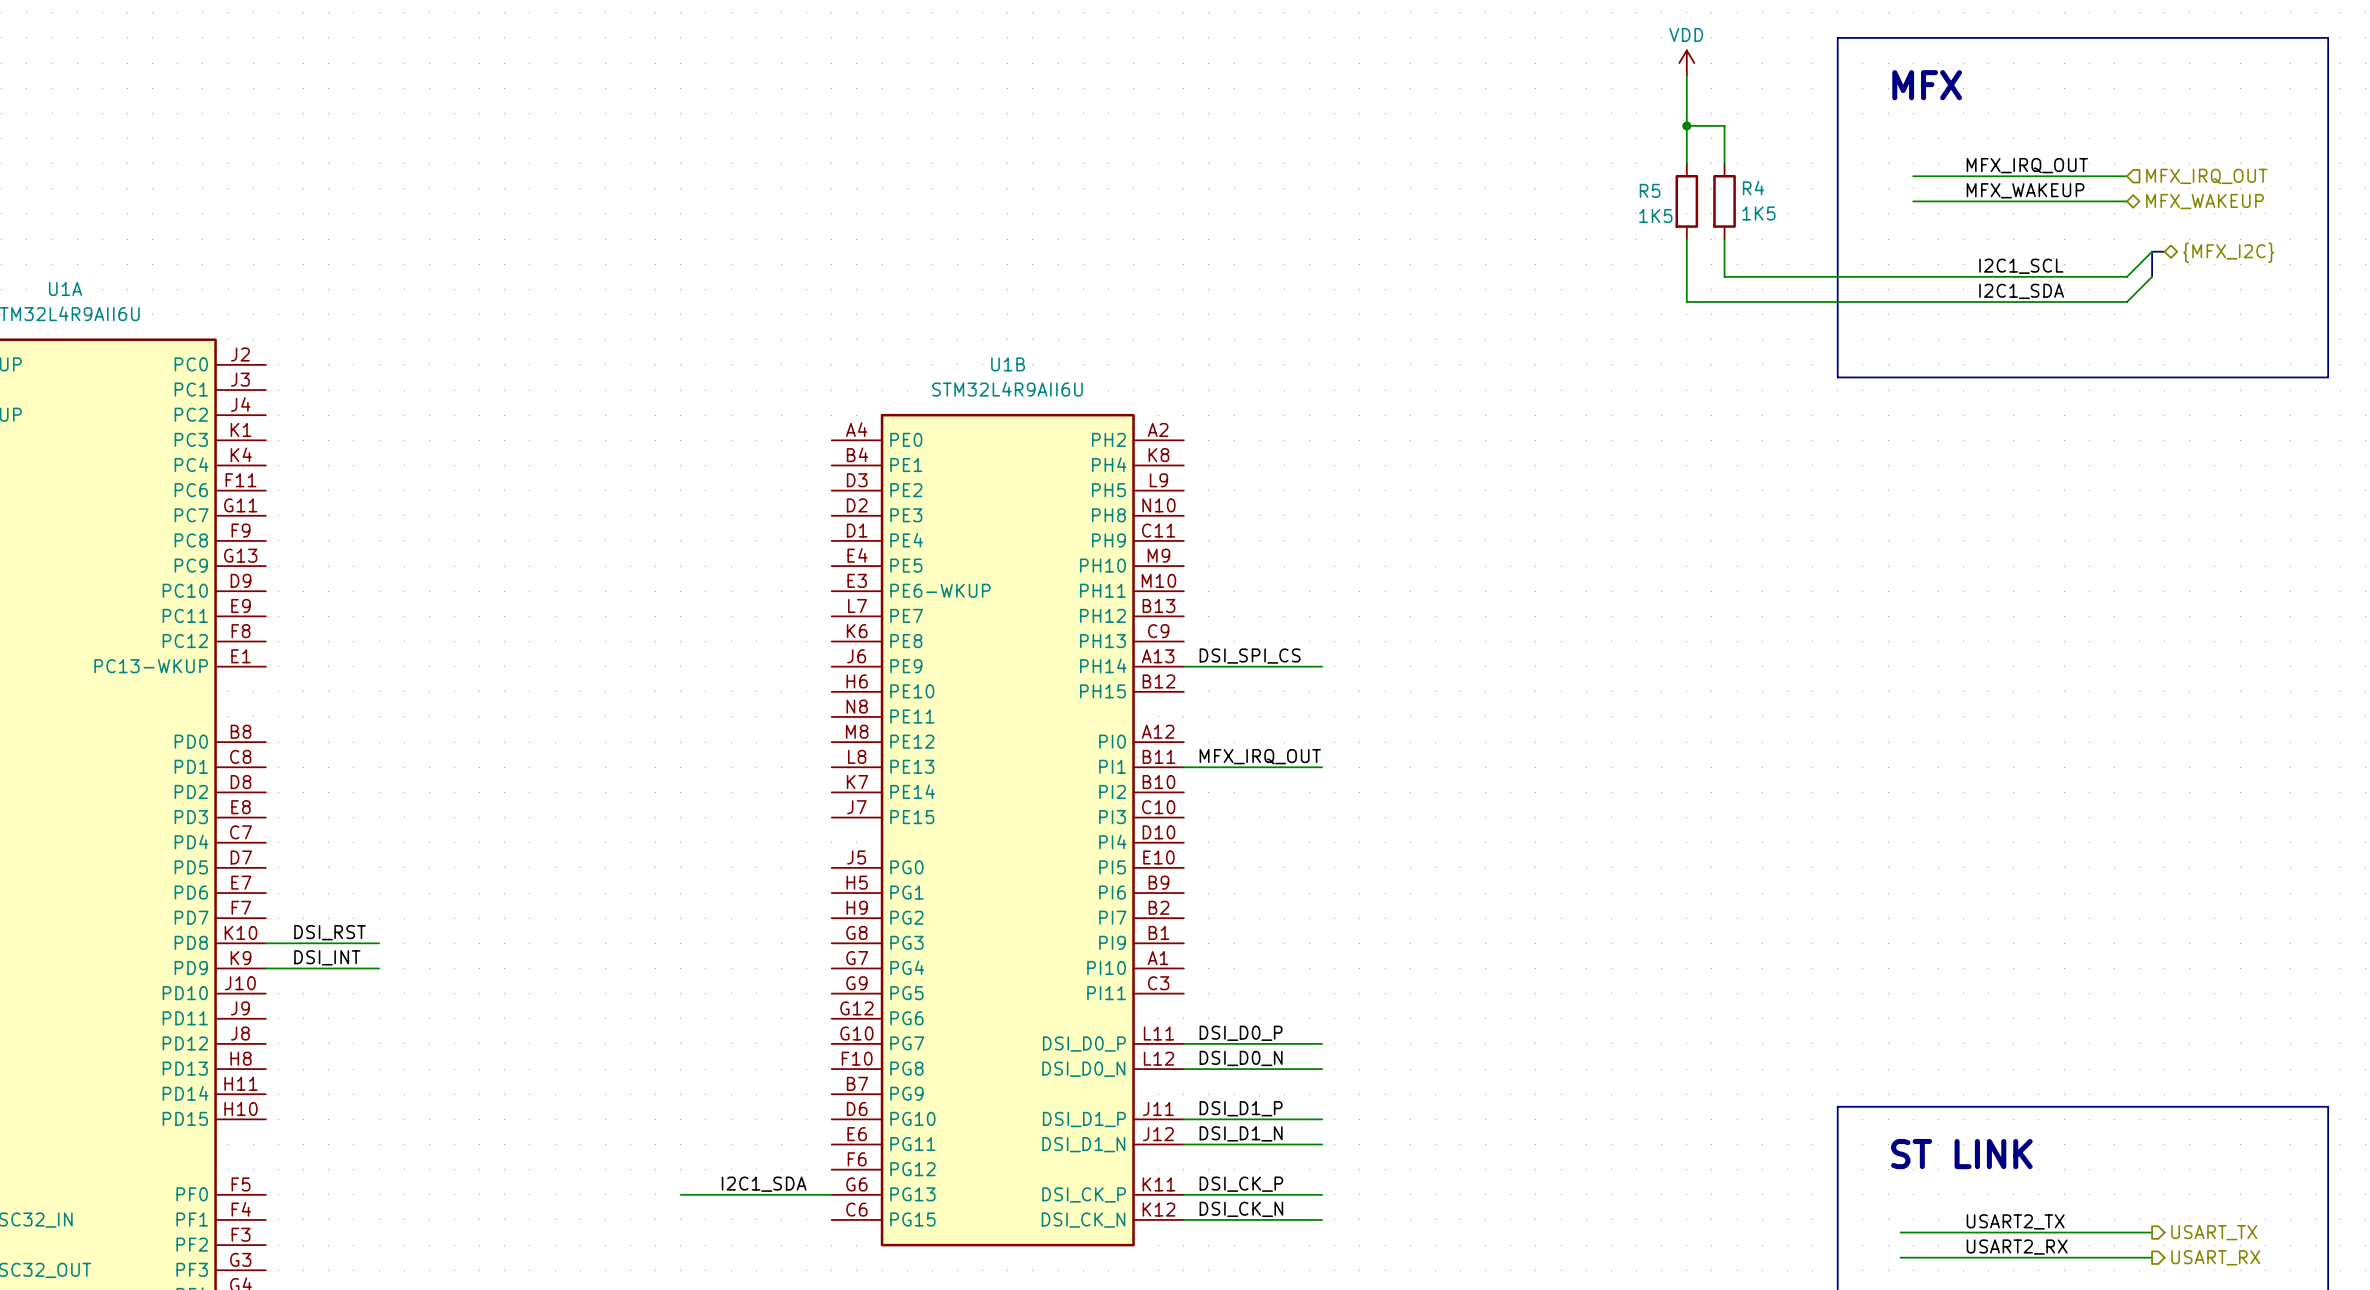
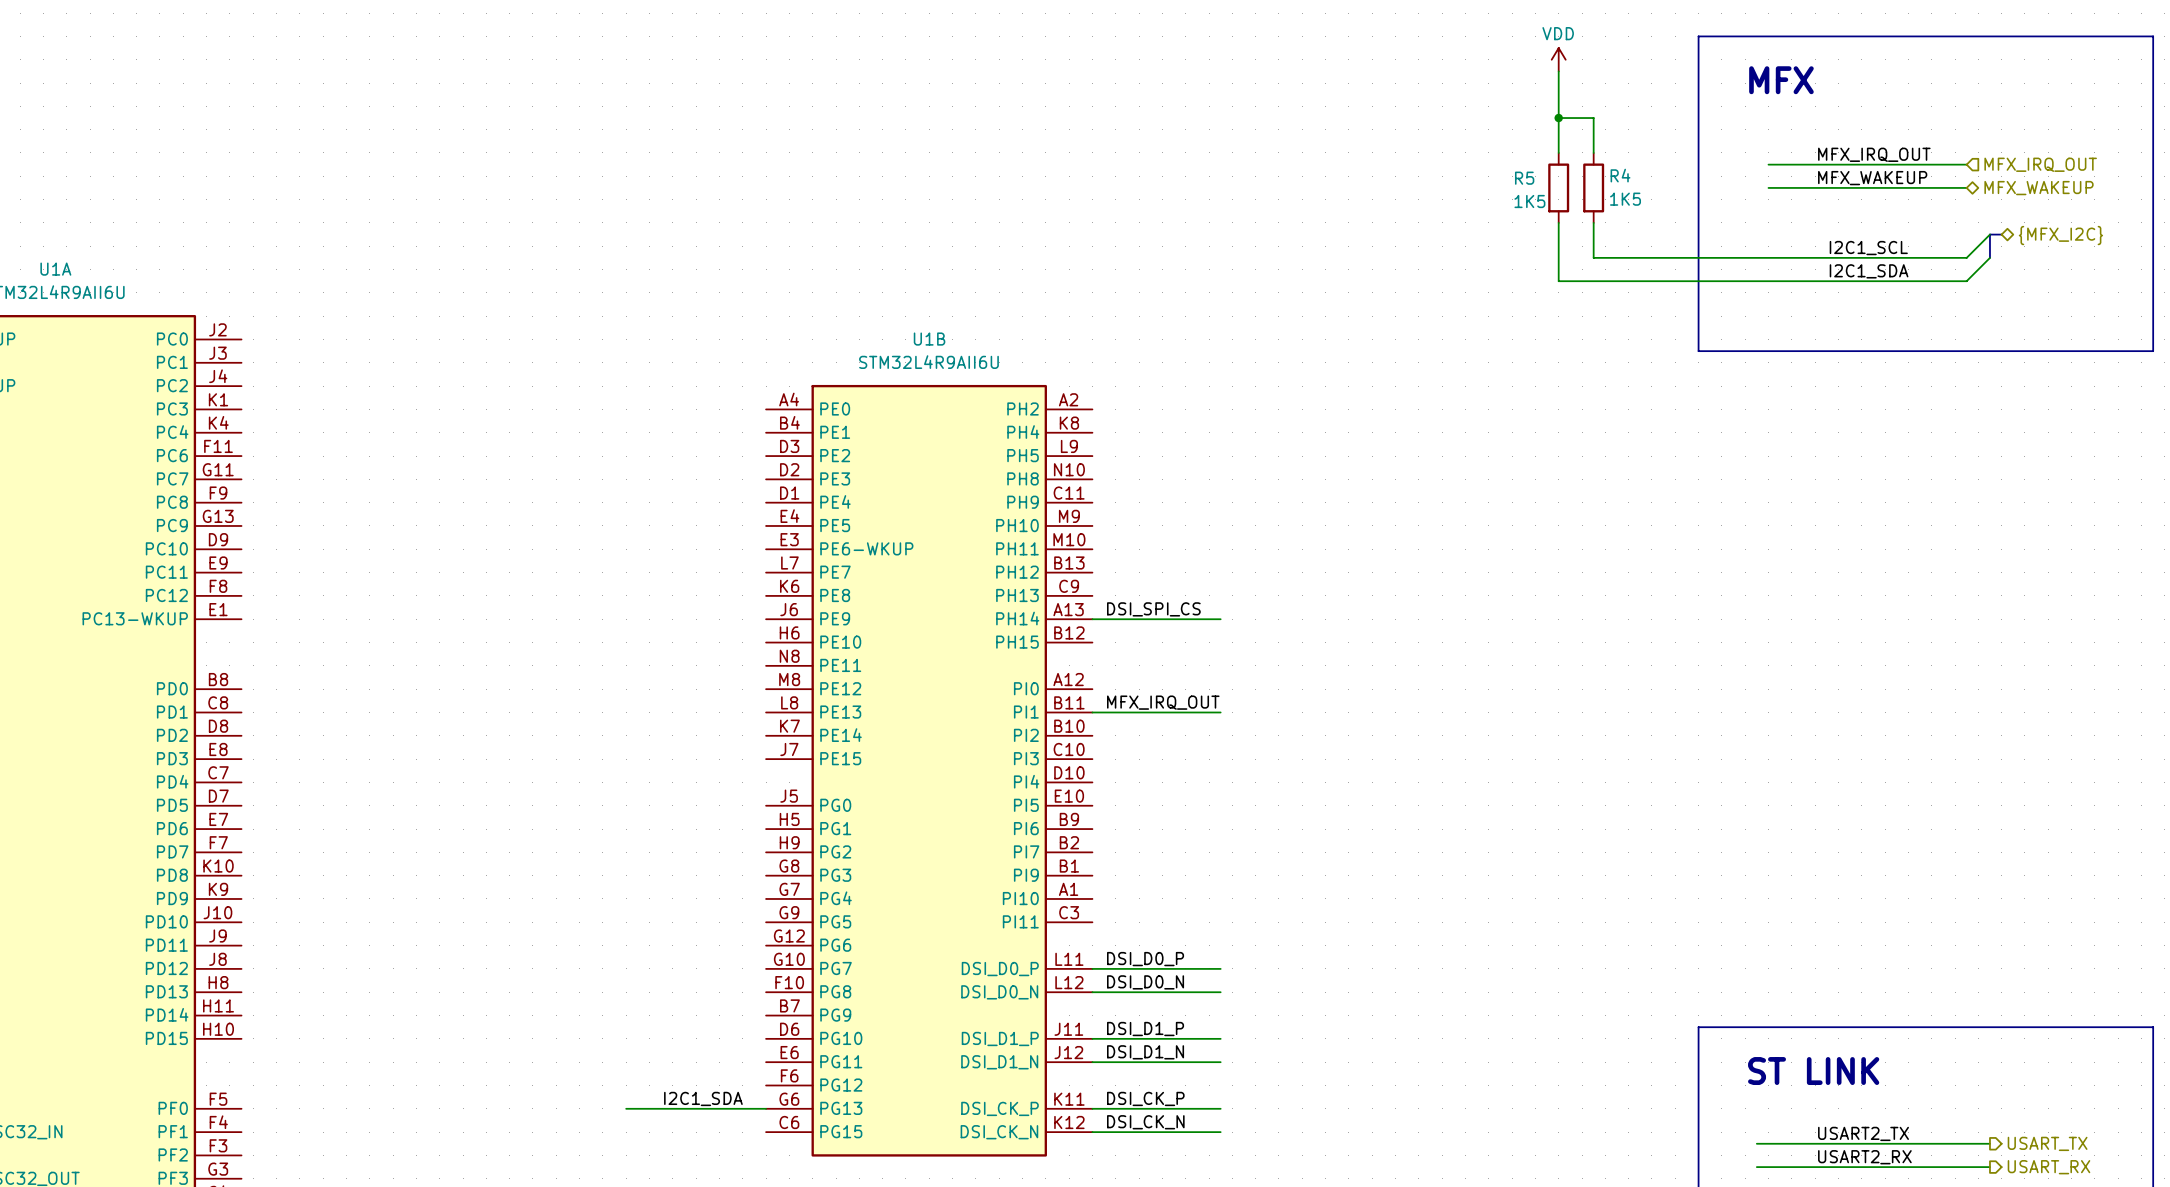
label: DSI_RST (330, 932) -> none
wire: (265, 943) (379, 943) -> none
label: DSI_INT (327, 957) -> none
wire: (265, 968) (379, 968) -> none

